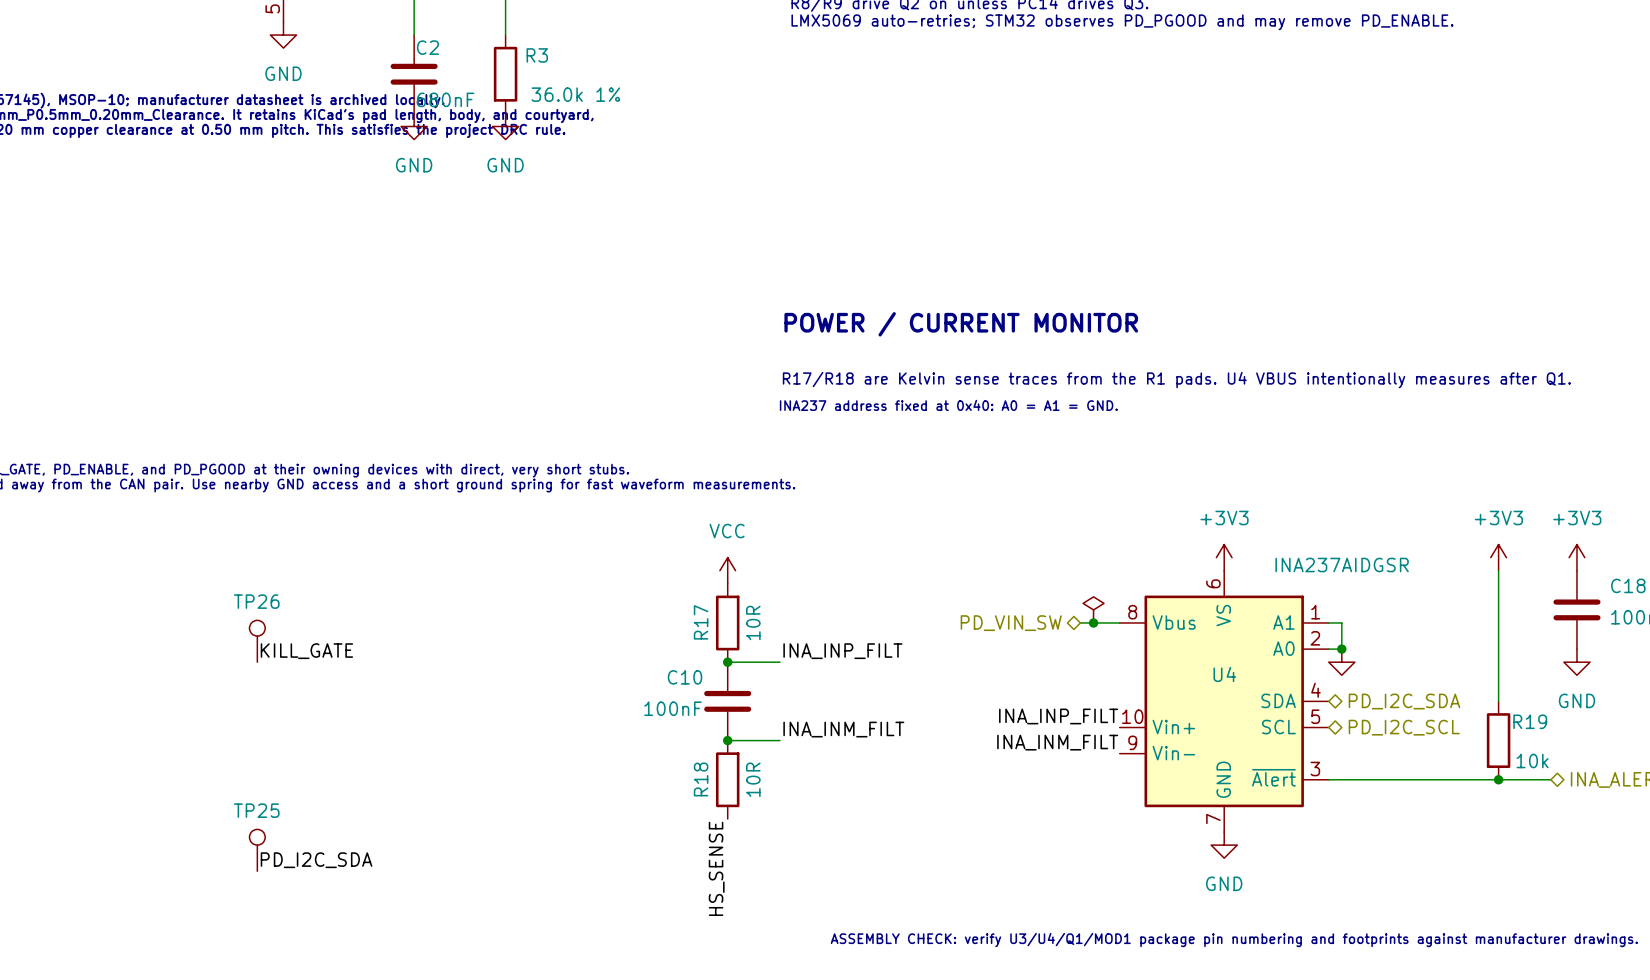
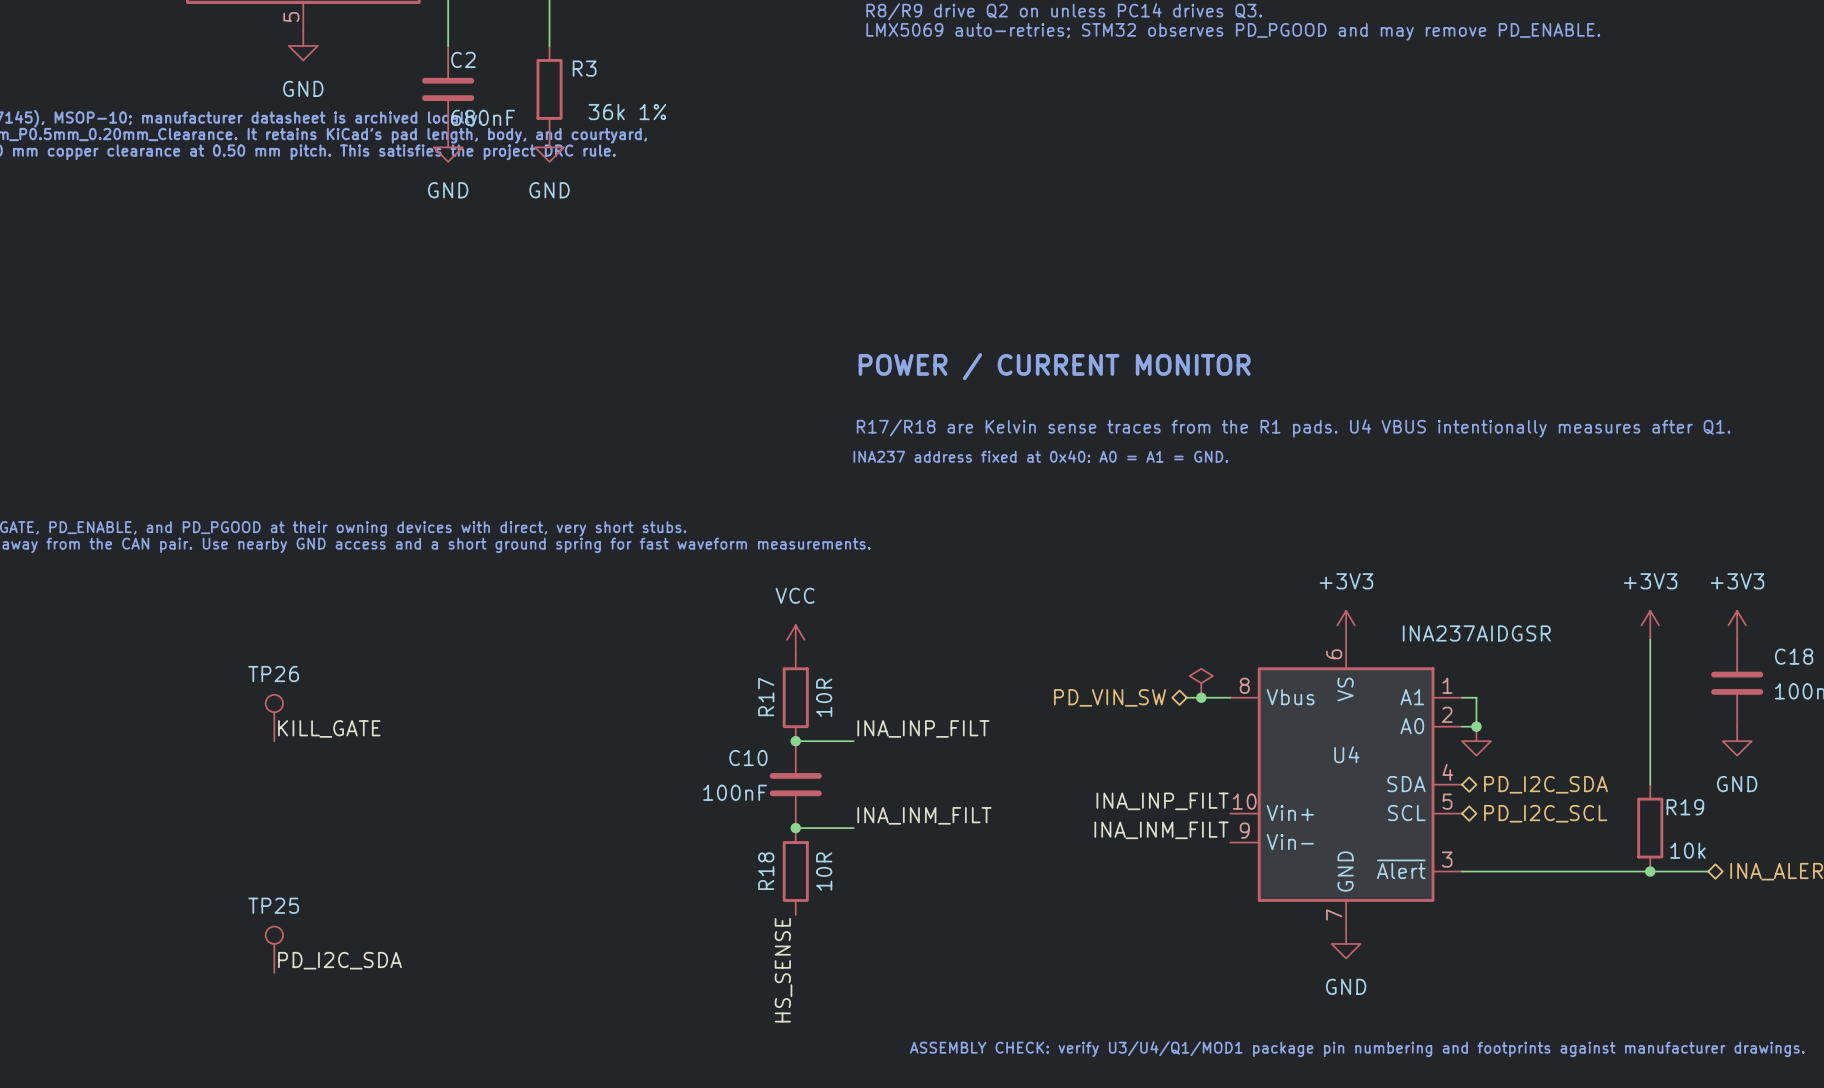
R3 value: 36.0k 1% (575, 94) -> 36k 1% (627, 112)

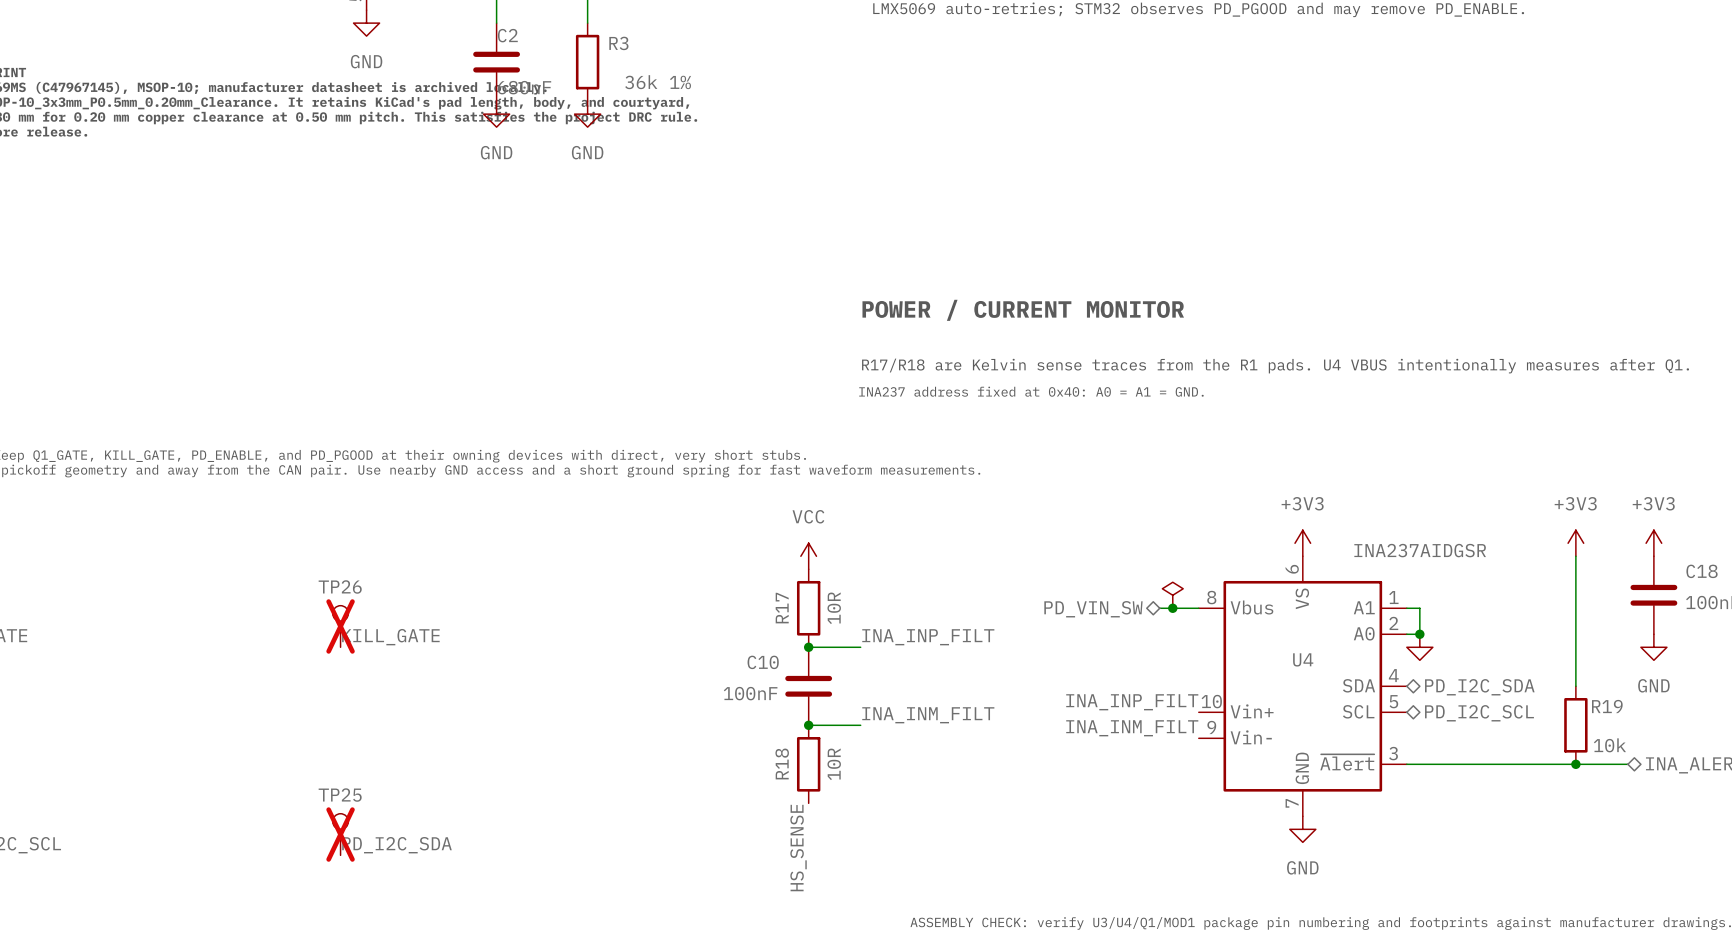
TP26 do-not-place cross: none -> (340, 626)
TP25 do-not-place cross: none -> (340, 834)

